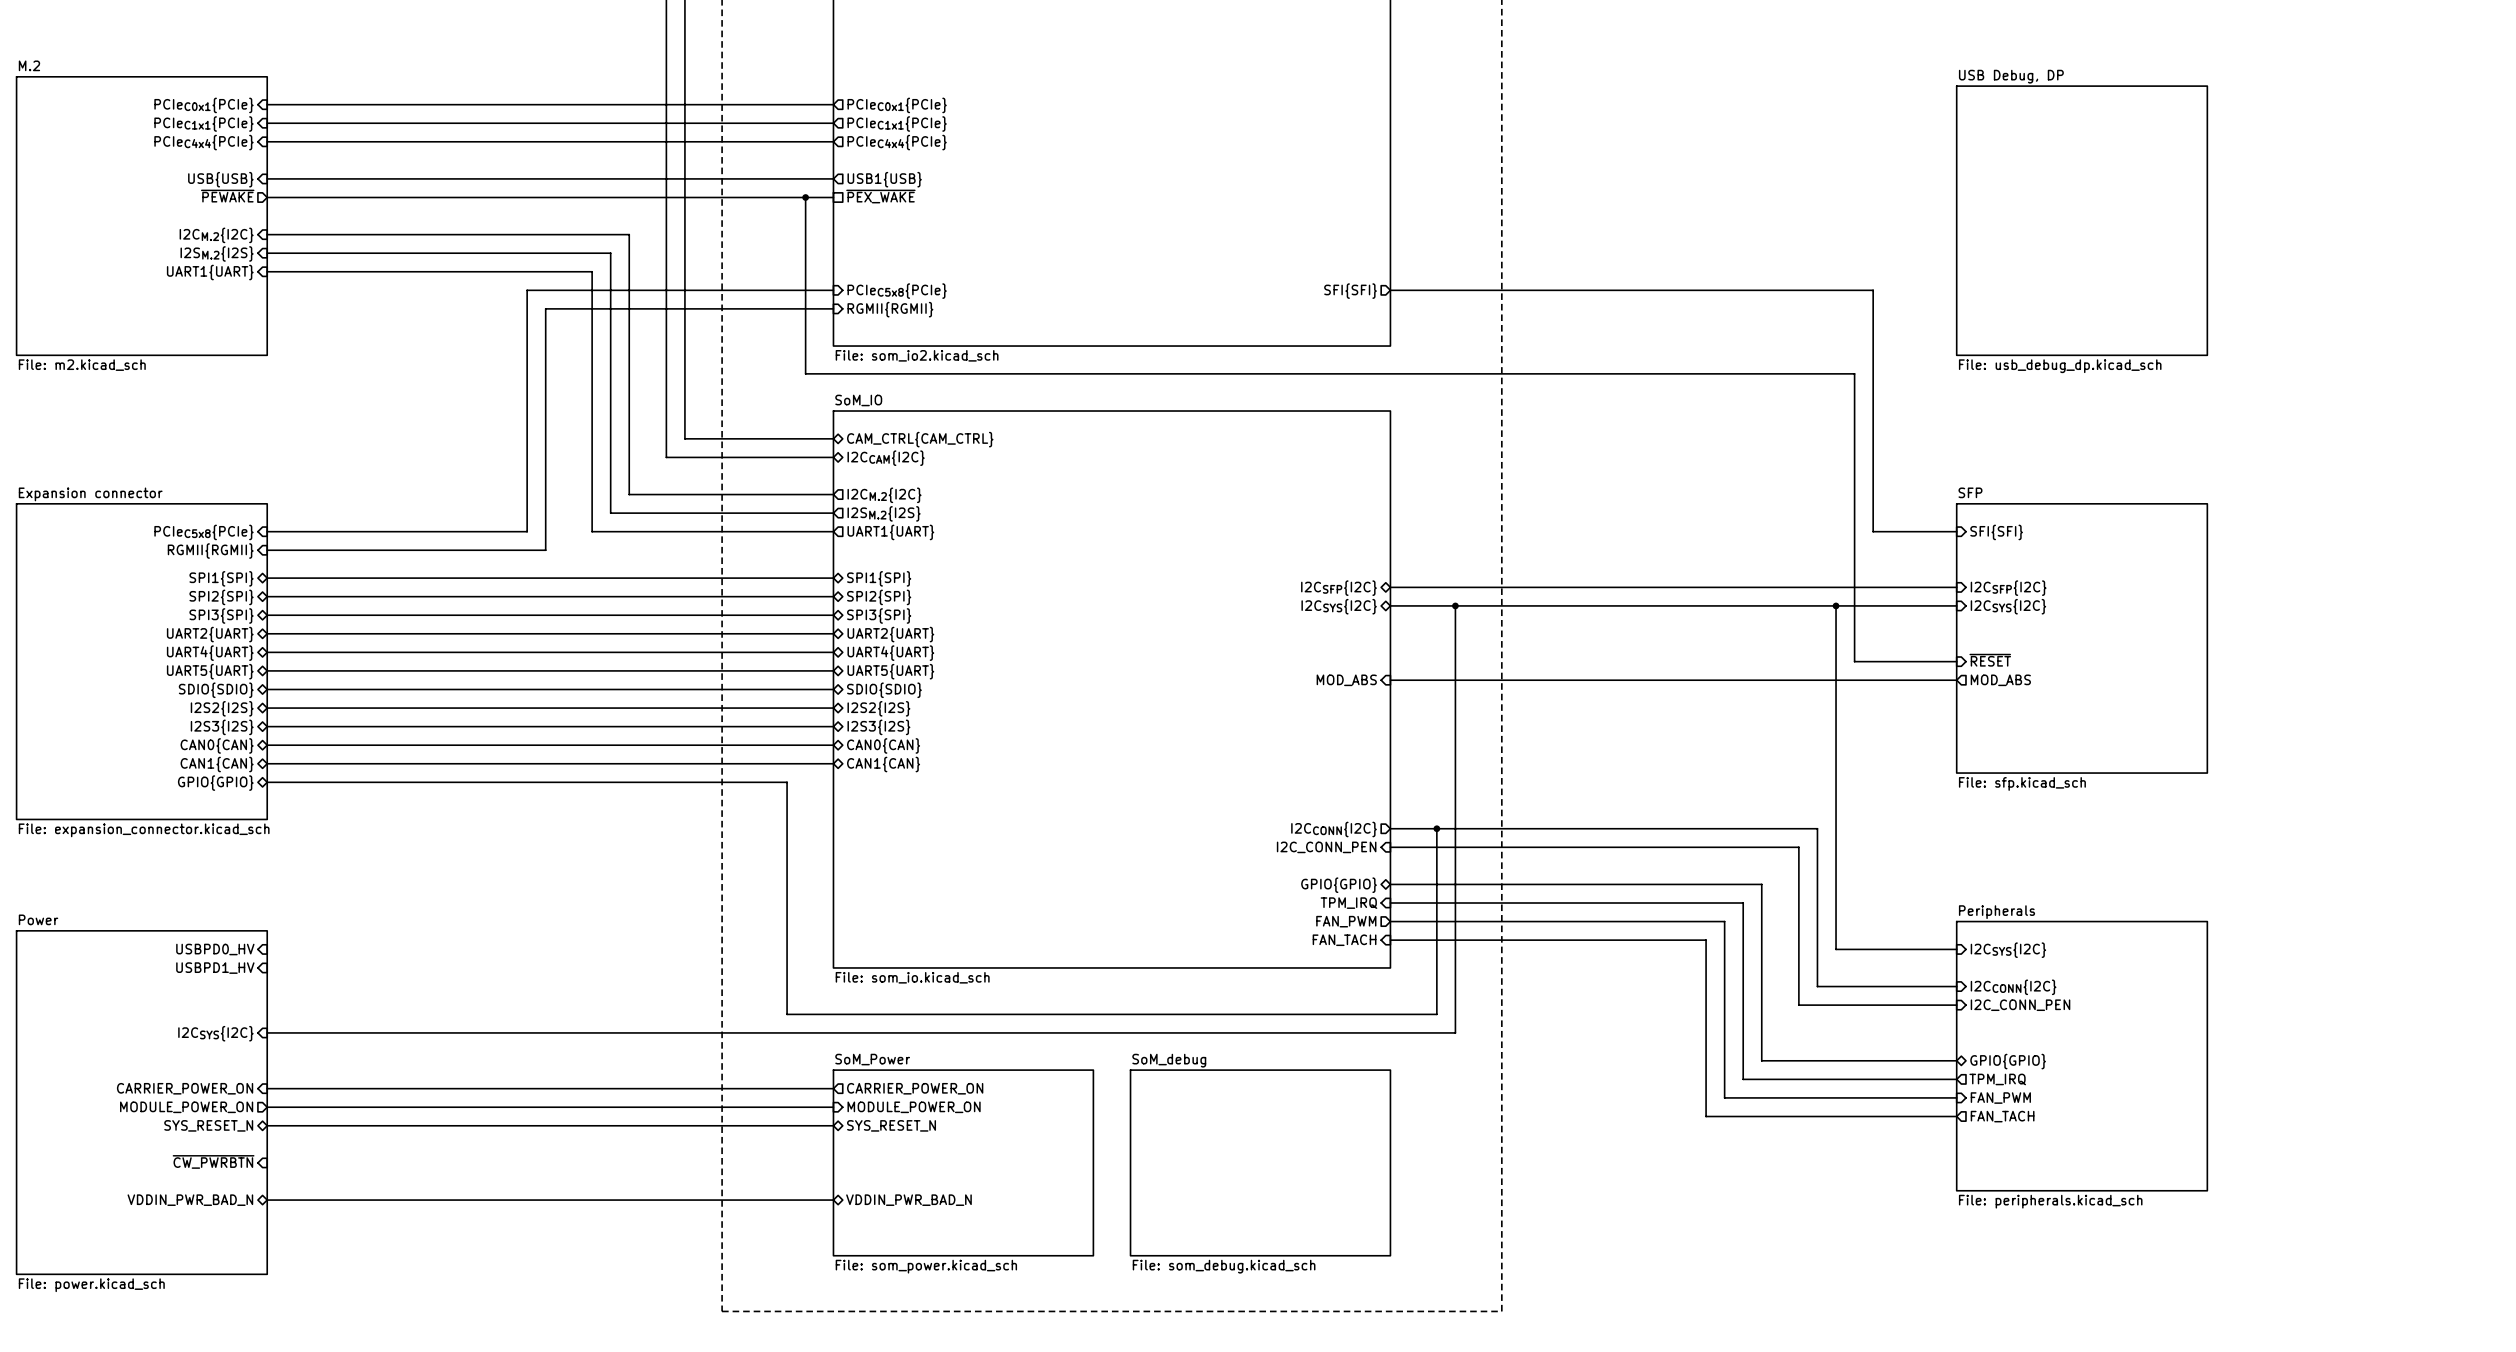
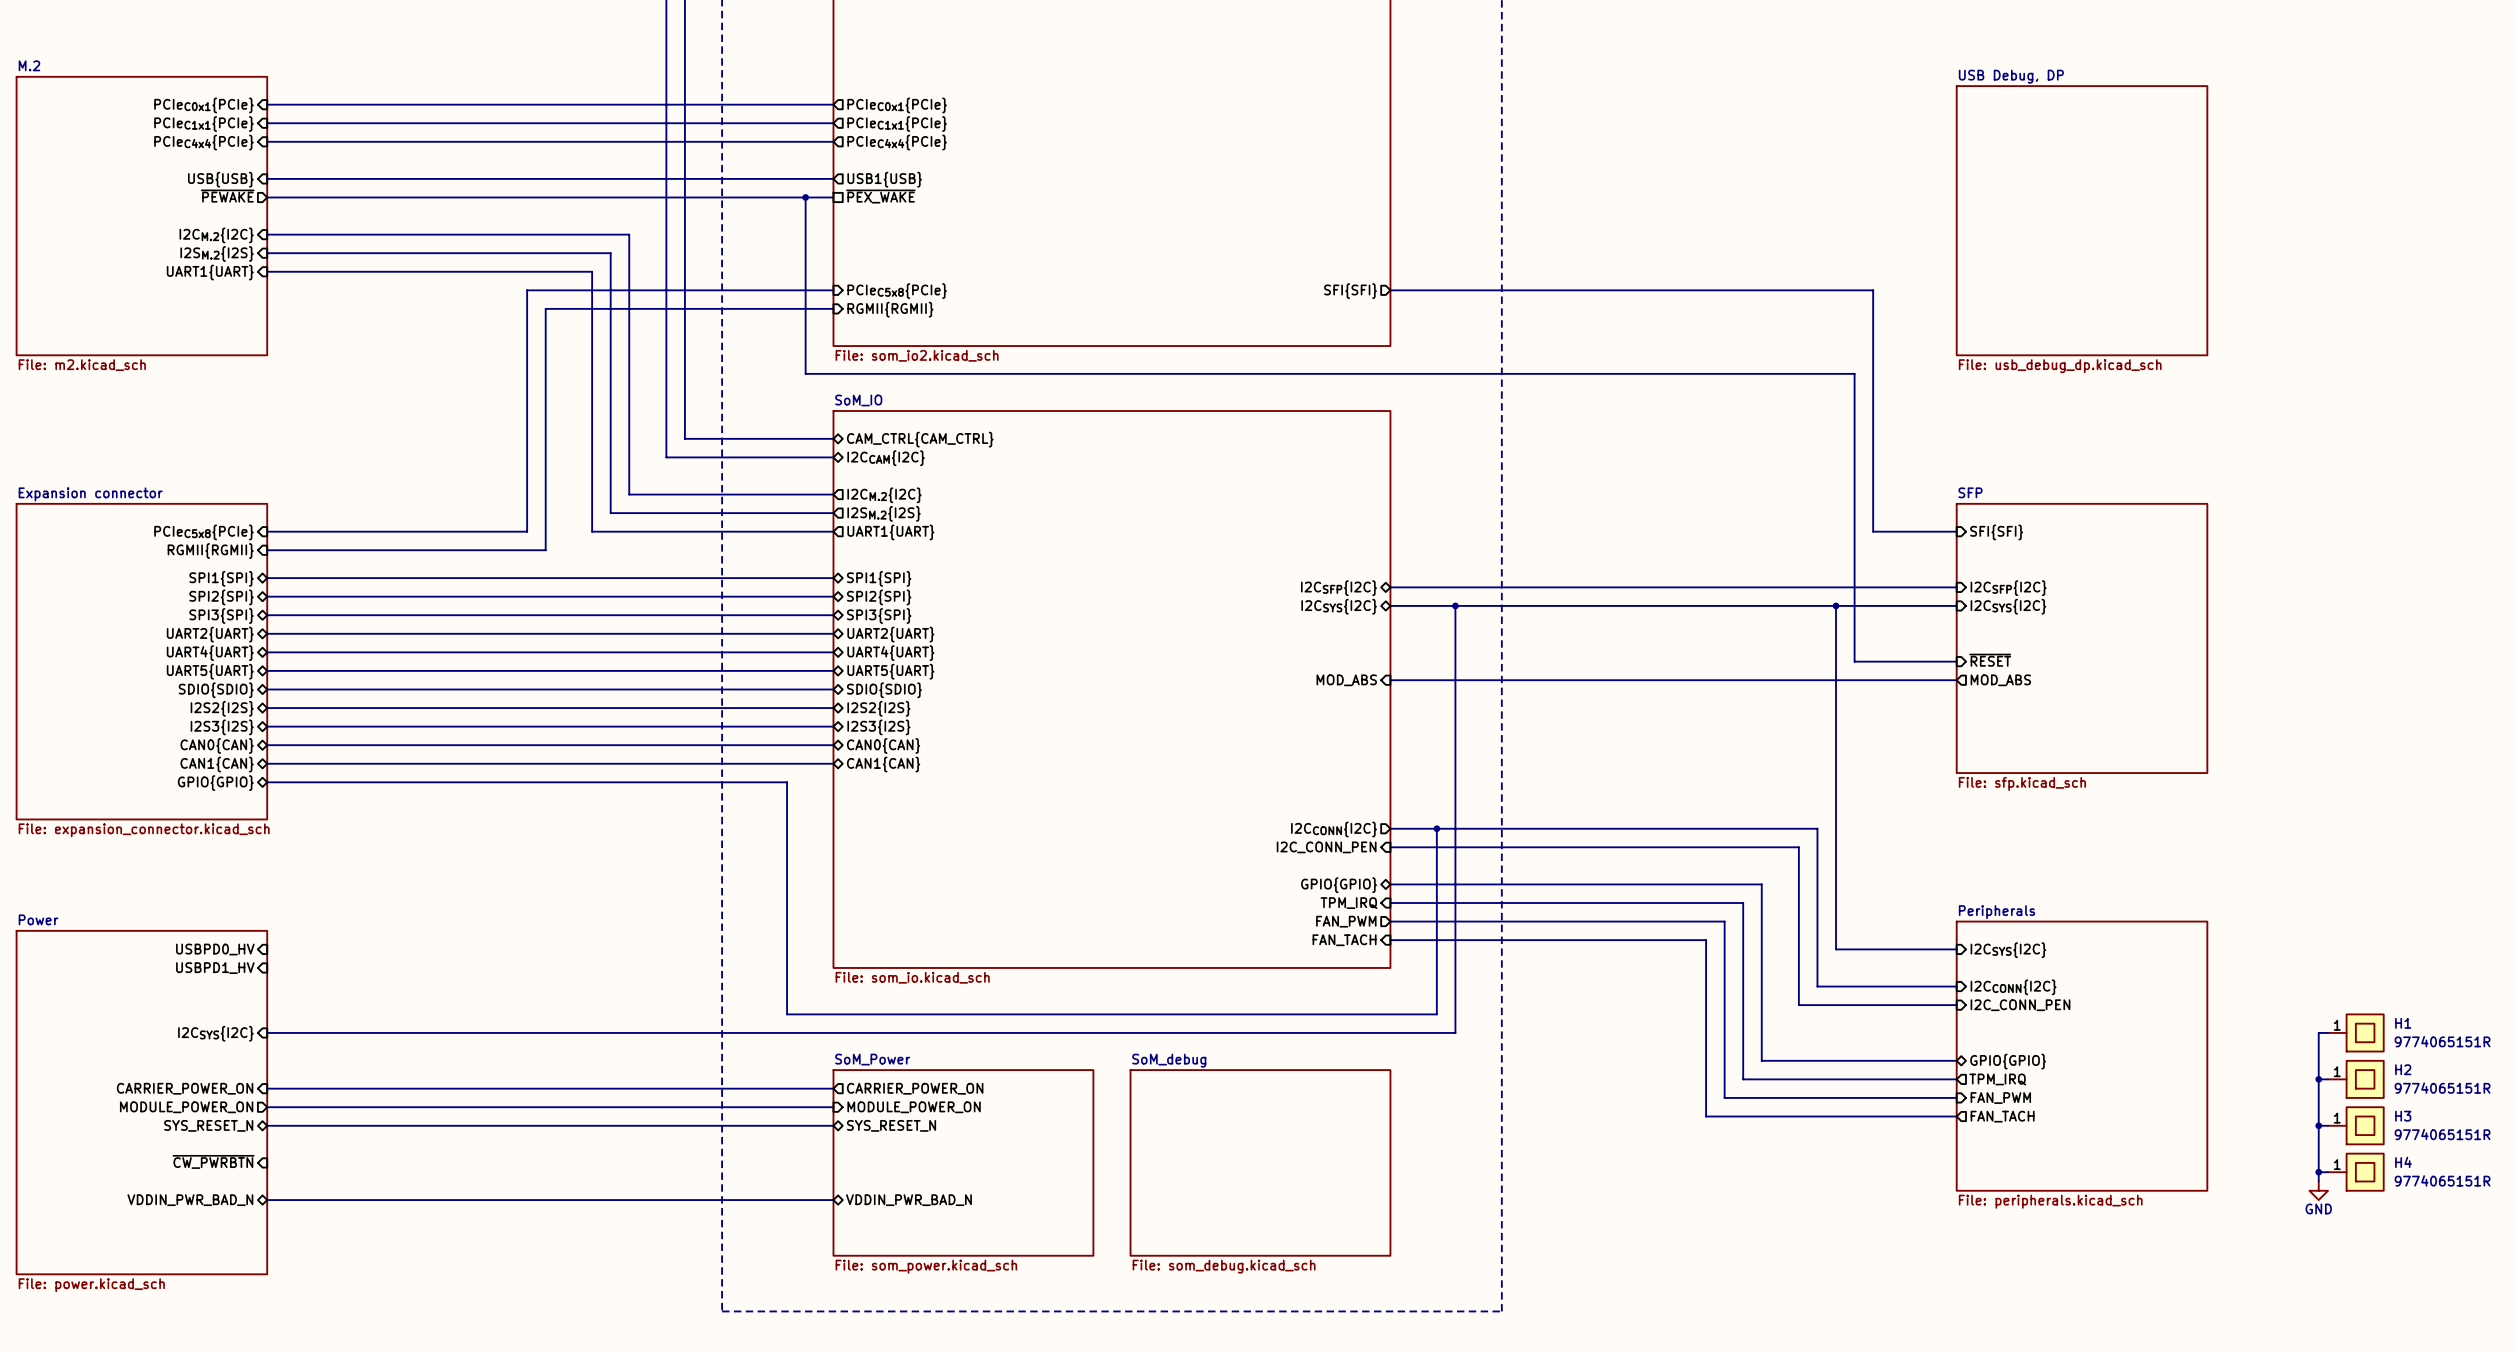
wire: none -> (2328, 1032) (2318, 1032) (2318, 1181)
H1: none -> (2356, 1032)
wire: none -> (2318, 1079) (2328, 1079)
junction: none -> (2318, 1079)
H2: none -> (2356, 1079)
wire: none -> (2318, 1125) (2328, 1125)
junction: none -> (2318, 1125)
H3: none -> (2356, 1125)
wire: none -> (2318, 1172) (2328, 1172)
junction: none -> (2318, 1172)
H4: none -> (2356, 1172)
power symbol: none -> GND (2318, 1190)

